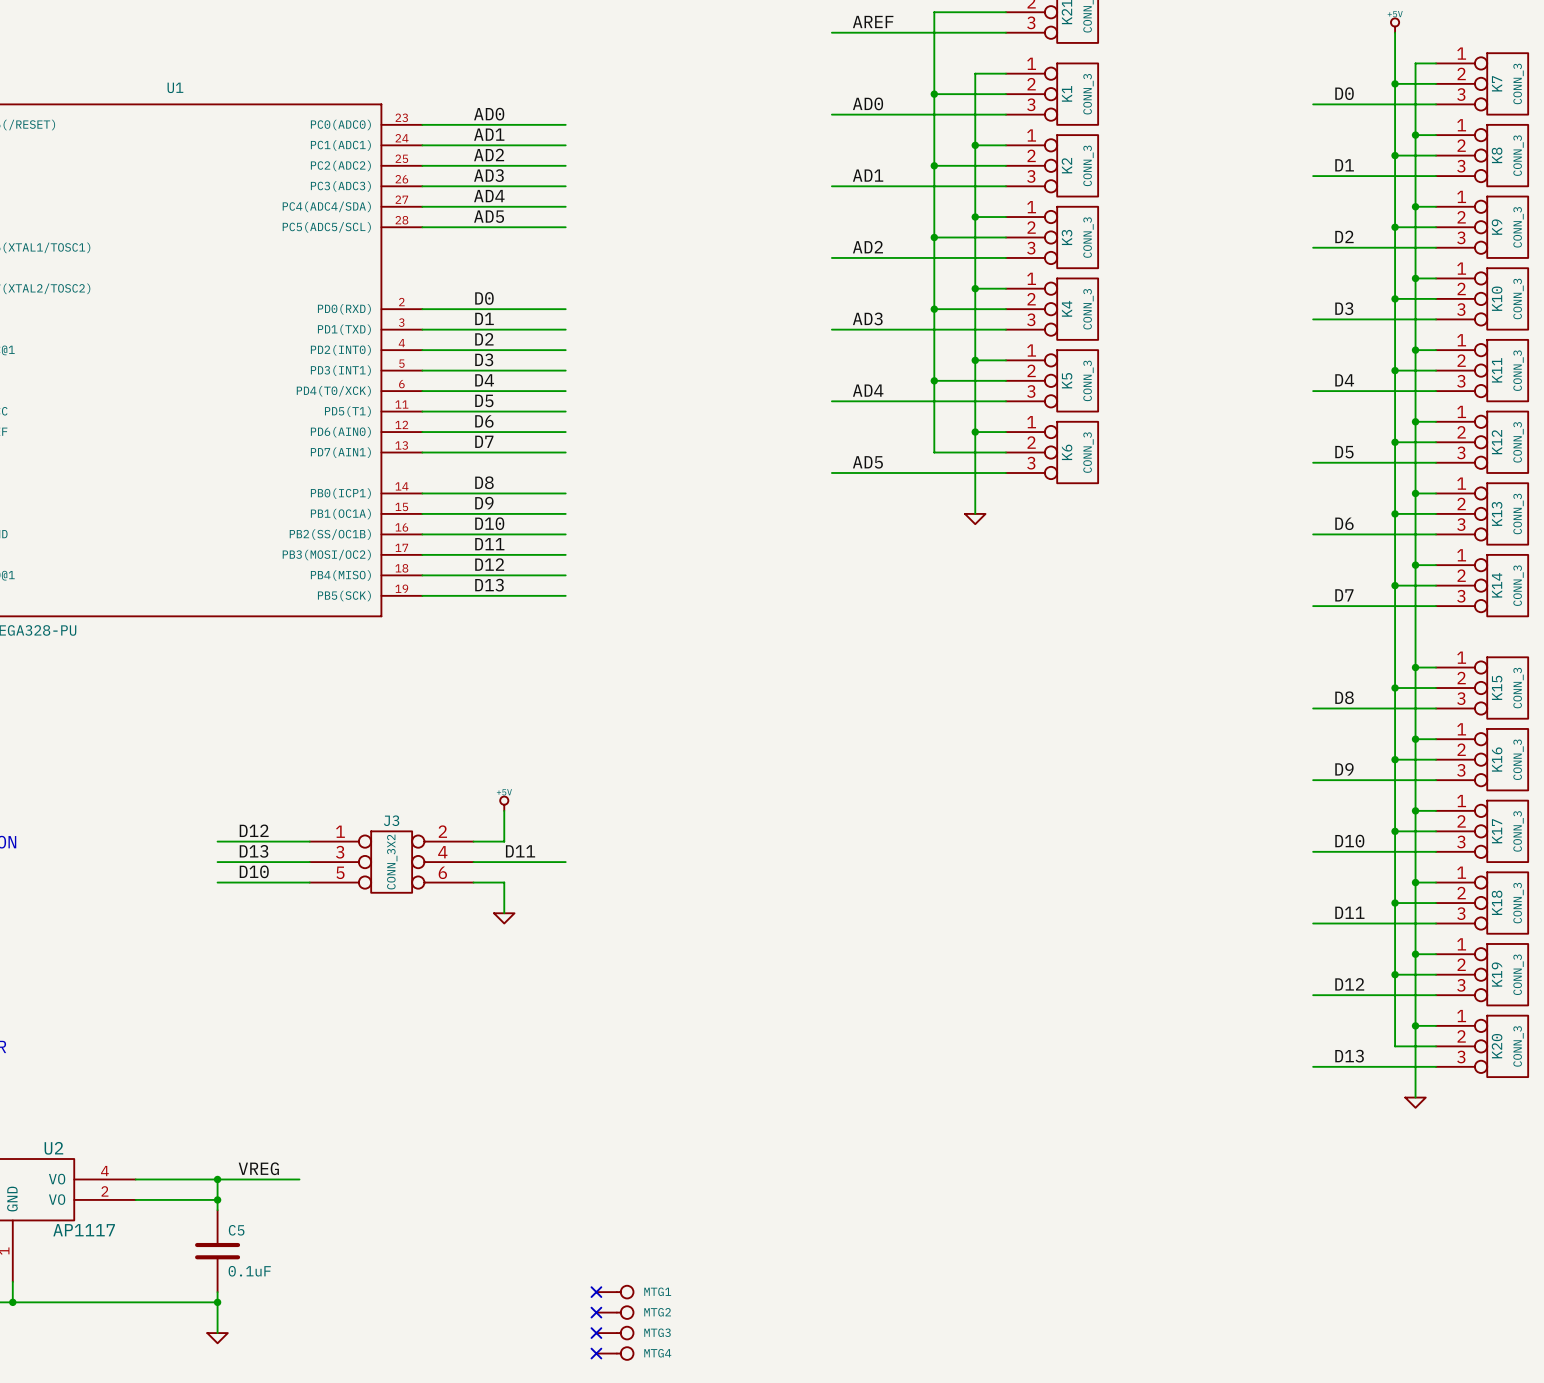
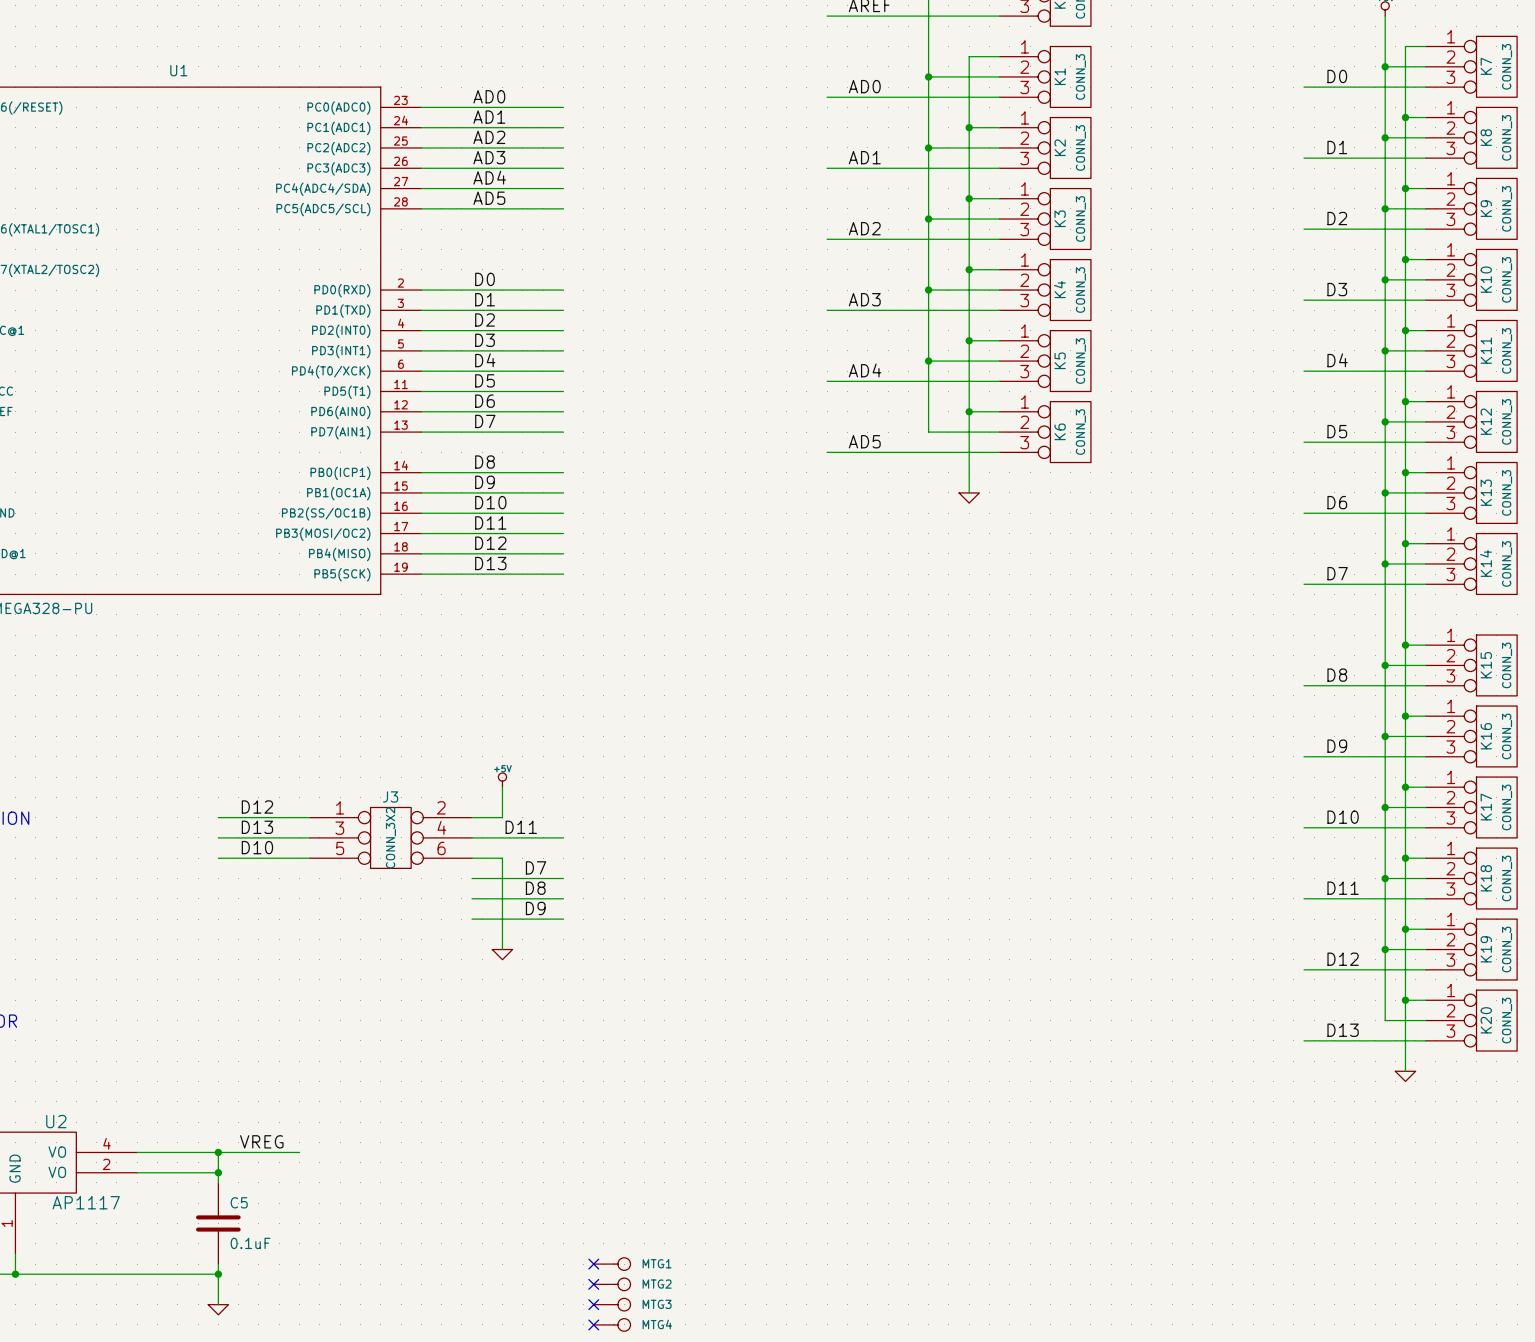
label: none -> D7 (536, 867)
wire: none -> (472, 878) (563, 878)
label: none -> D8 (535, 888)
wire: none -> (502, 888) (502, 949)
power symbol position: (504, 918) -> (502, 954)
wire: none -> (472, 898) (563, 898)
label: none -> D9 (535, 908)
wire: none -> (472, 919) (563, 919)

